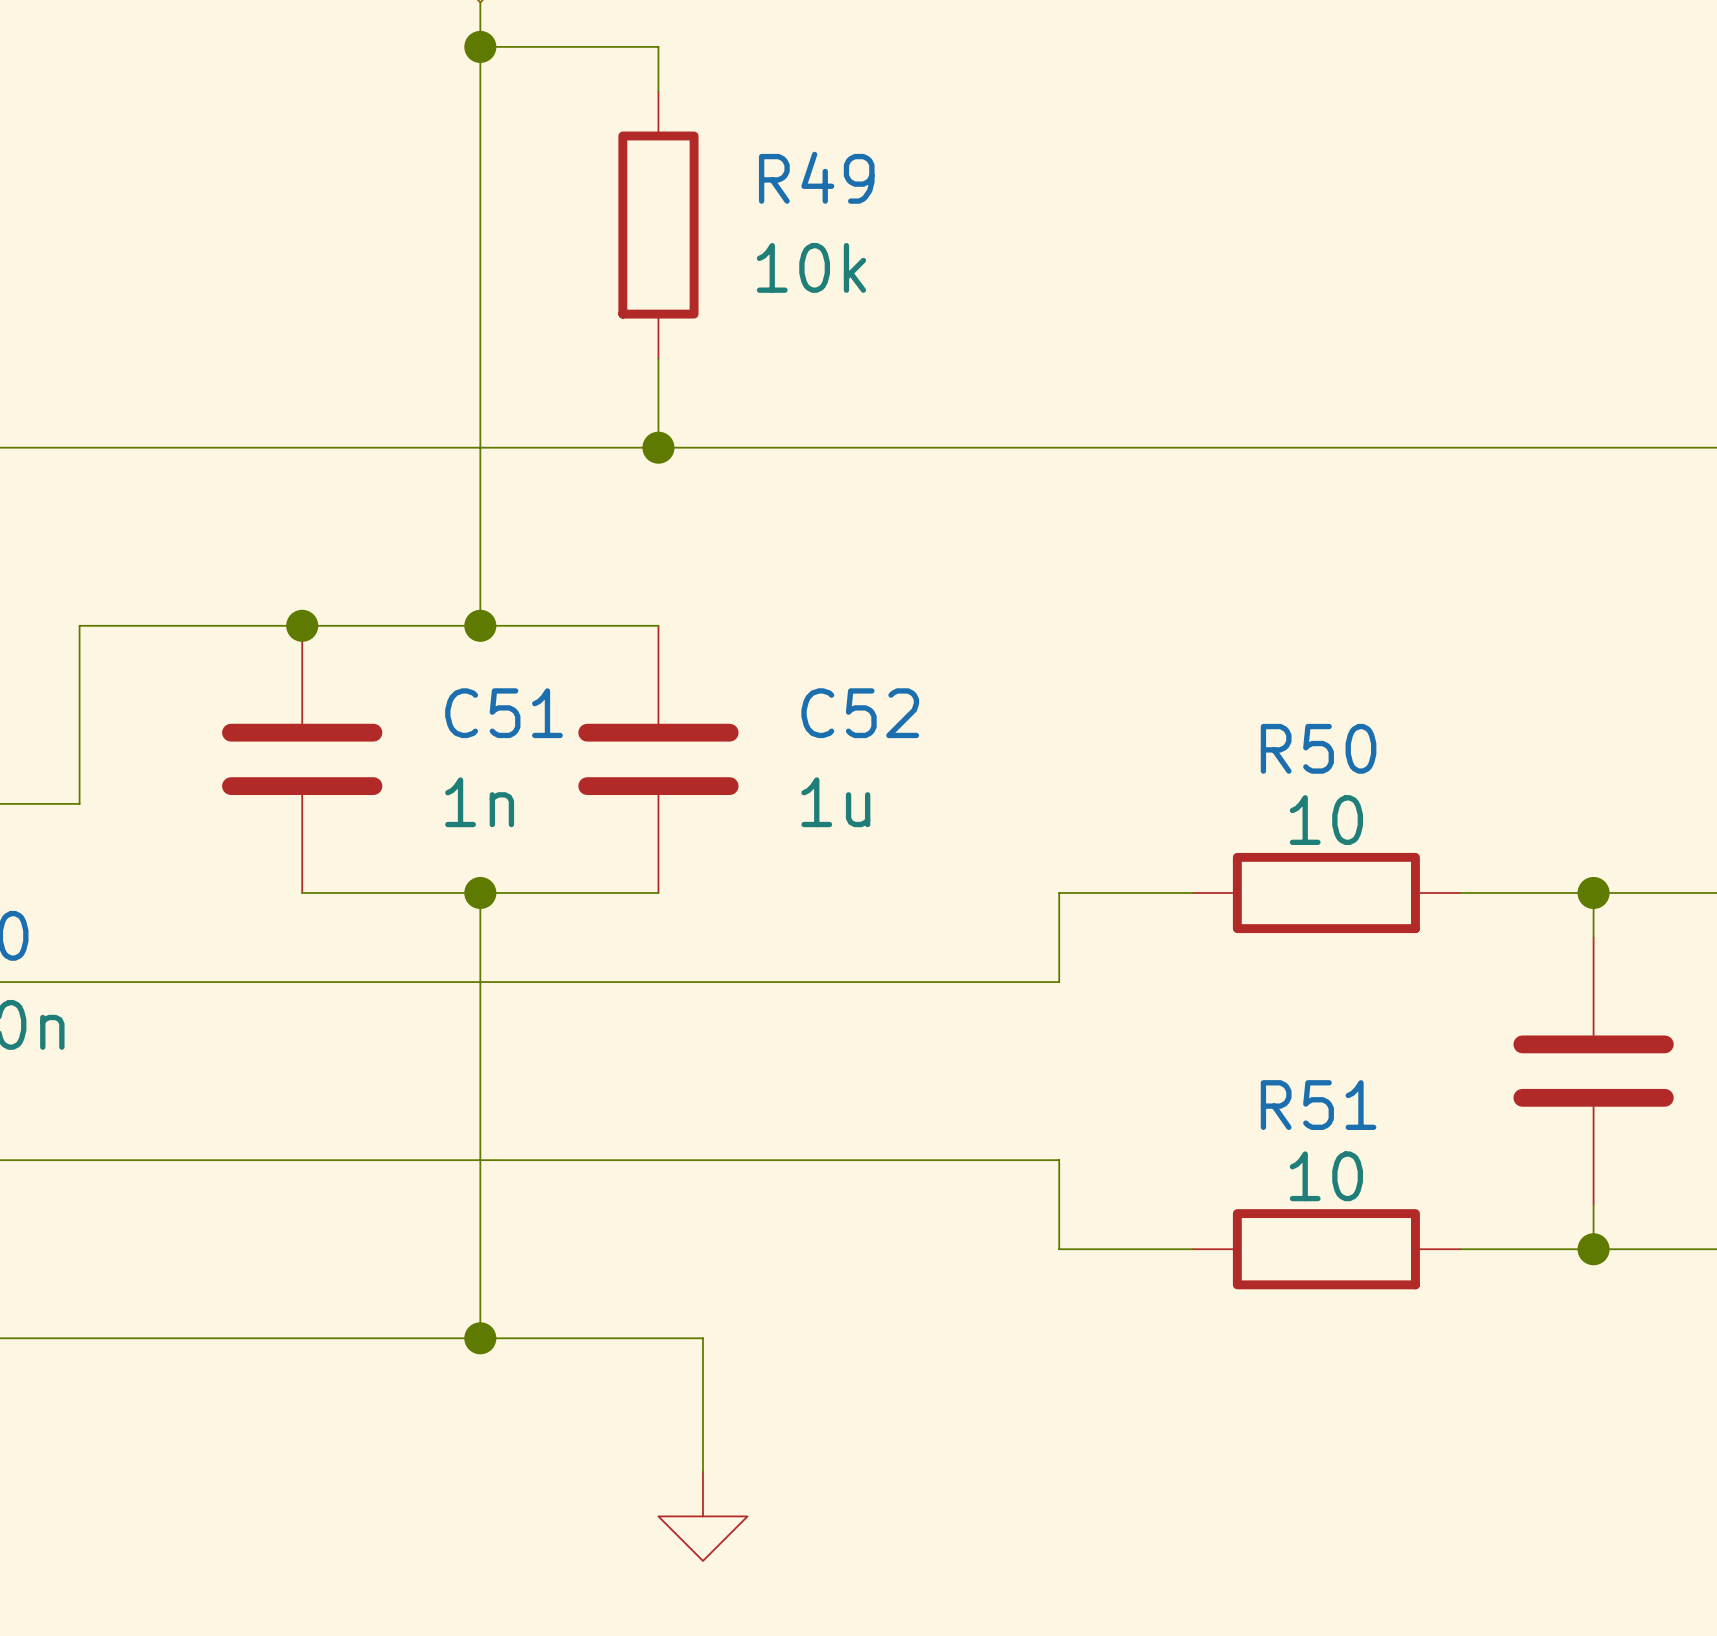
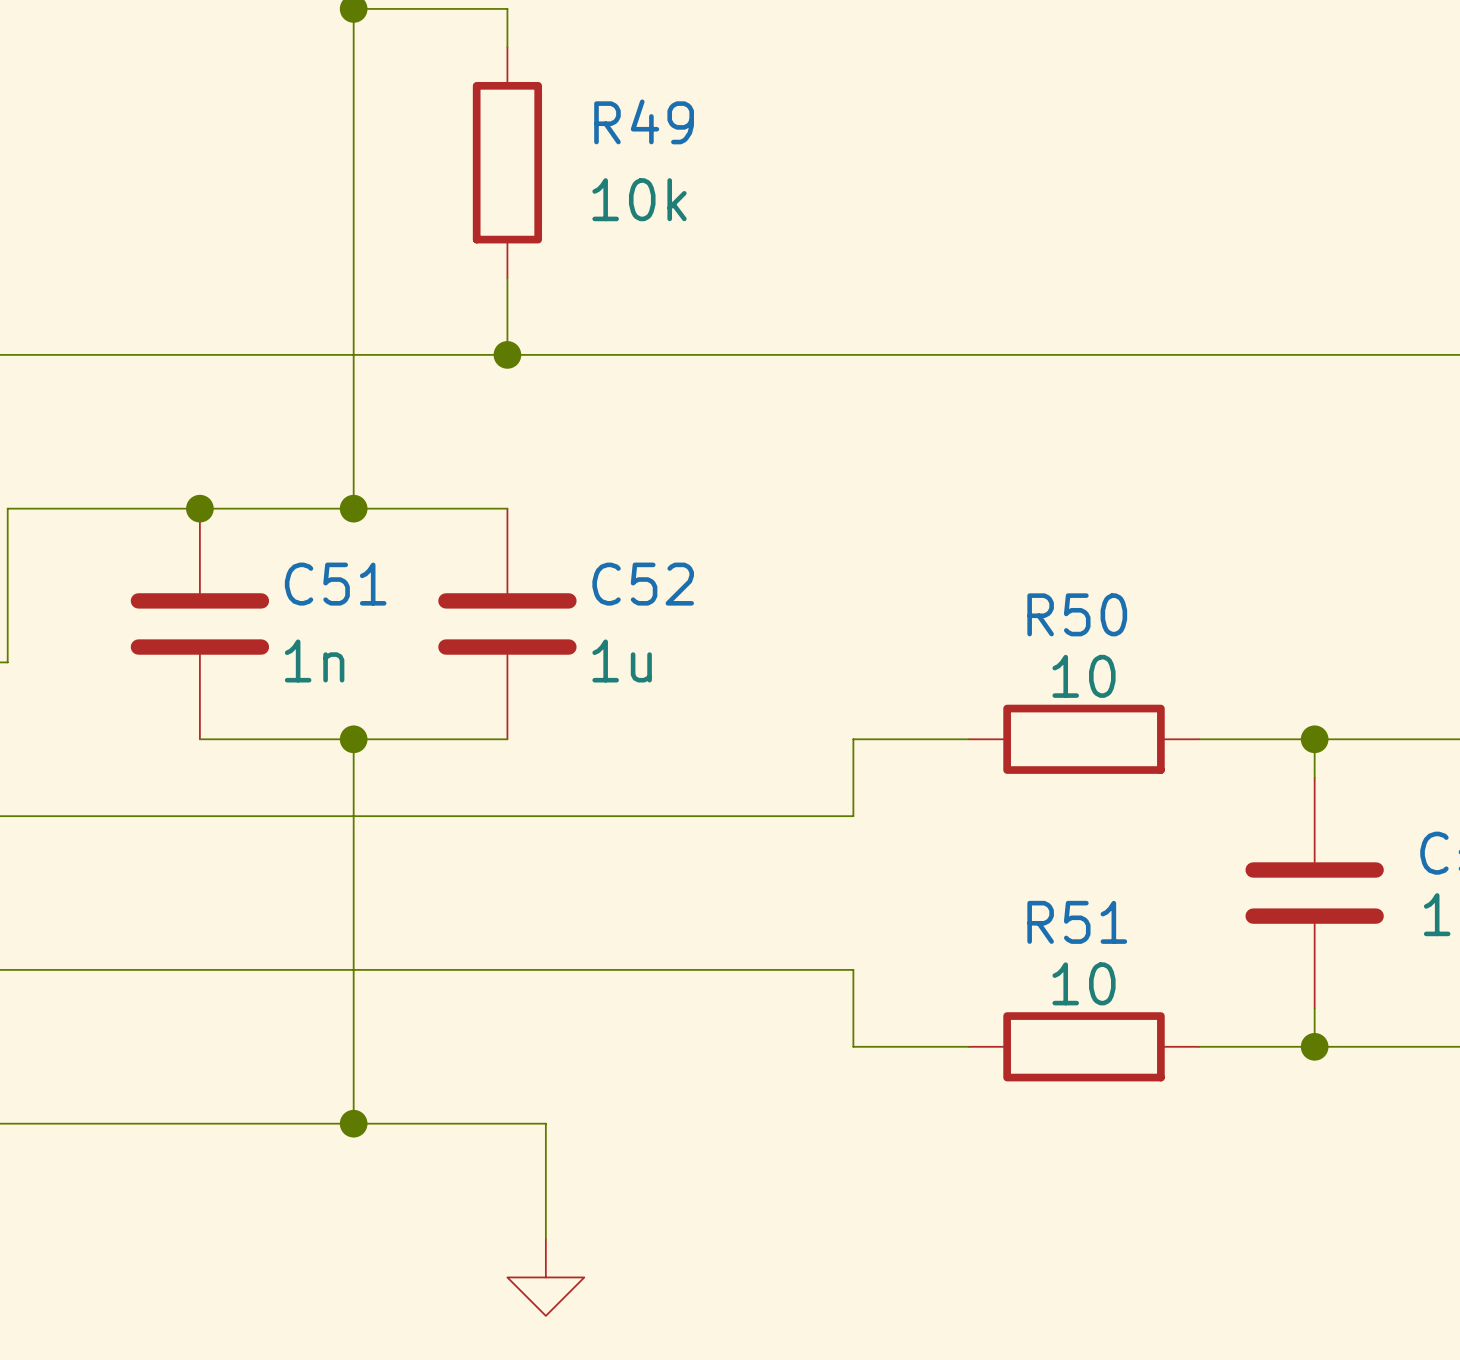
C51 name position: C51 (503, 713) -> C51 (335, 584)
C52 name position: C52 (860, 713) -> C52 (643, 584)
C51 value position: 1n (479, 802) -> 1n (314, 660)
C52 value position: 1u (835, 802) -> 1u (622, 660)

